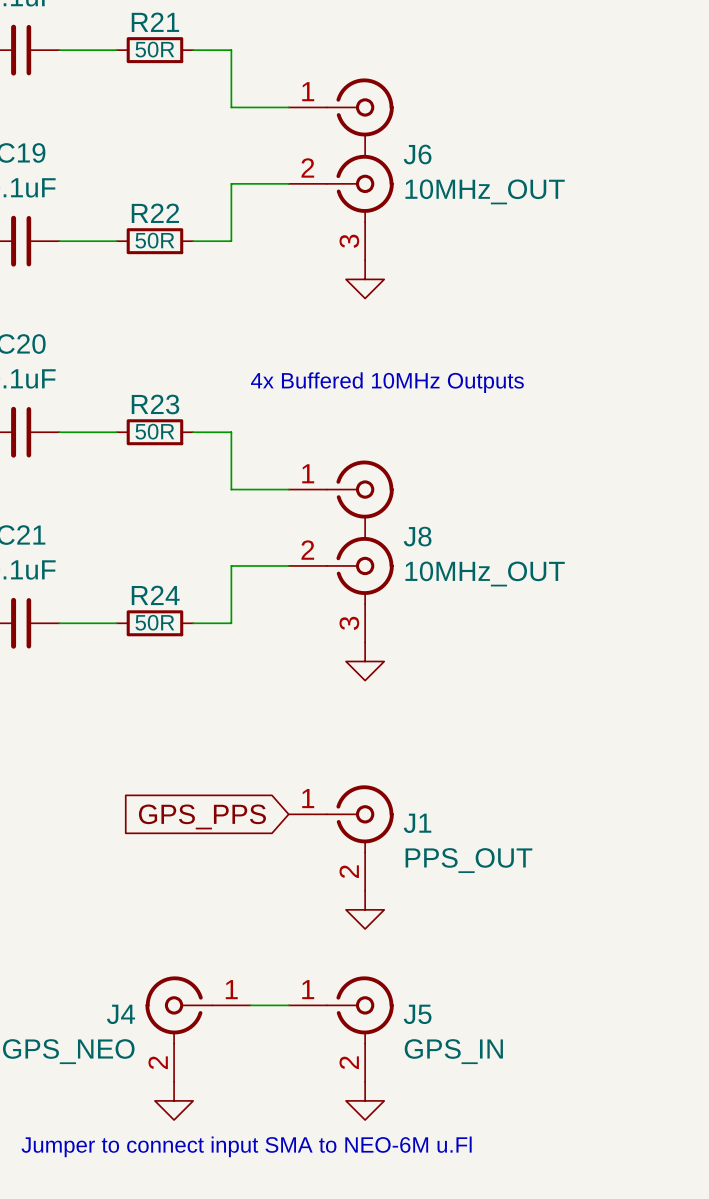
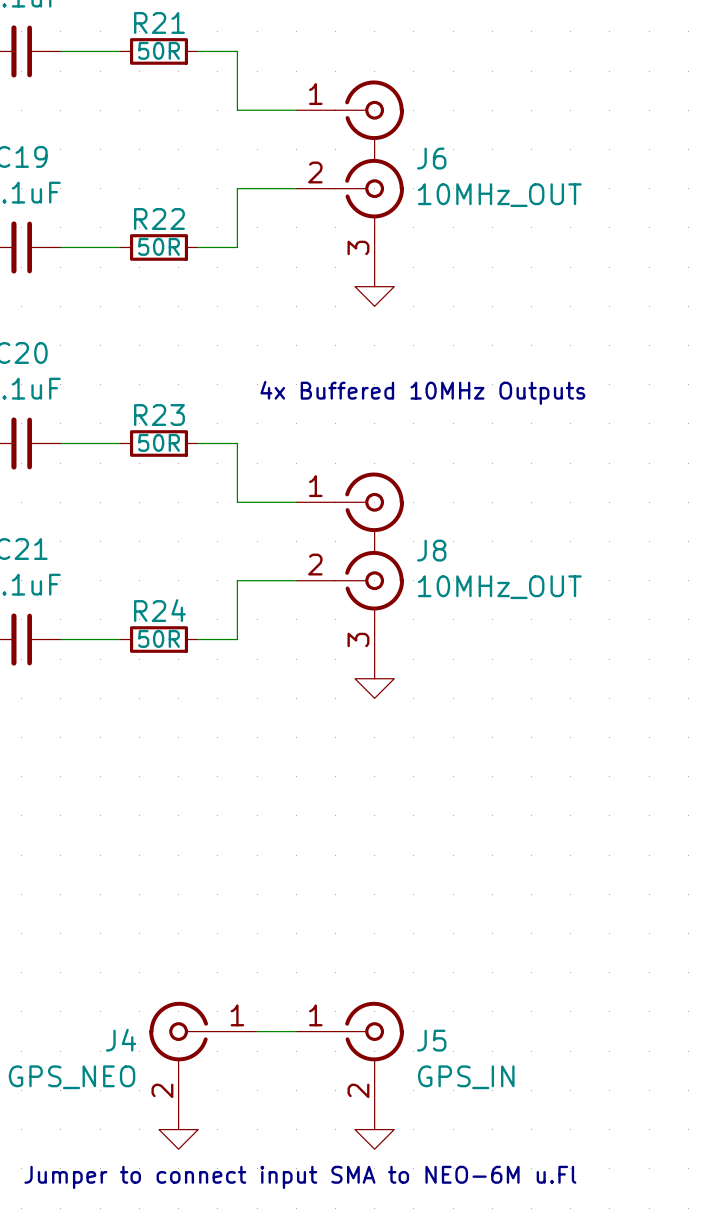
global label: GPS_PPS (202, 816) -> none
J1: PPS_OUT (341, 838) -> none
power symbol: (365, 909) -> none

